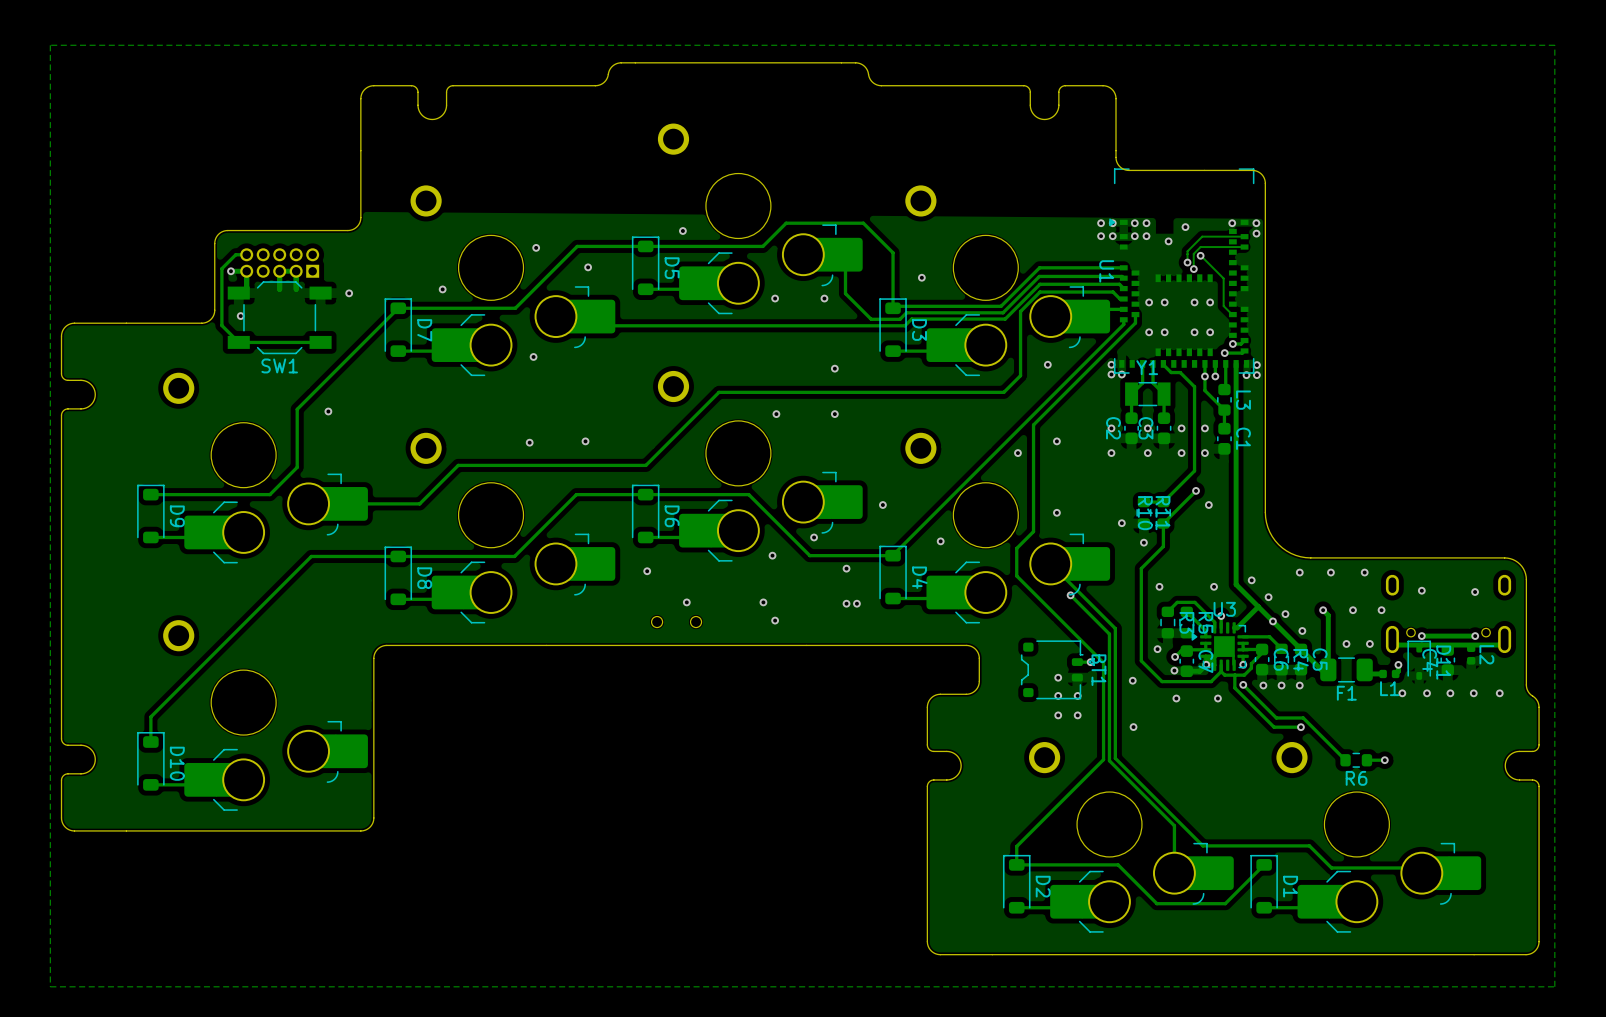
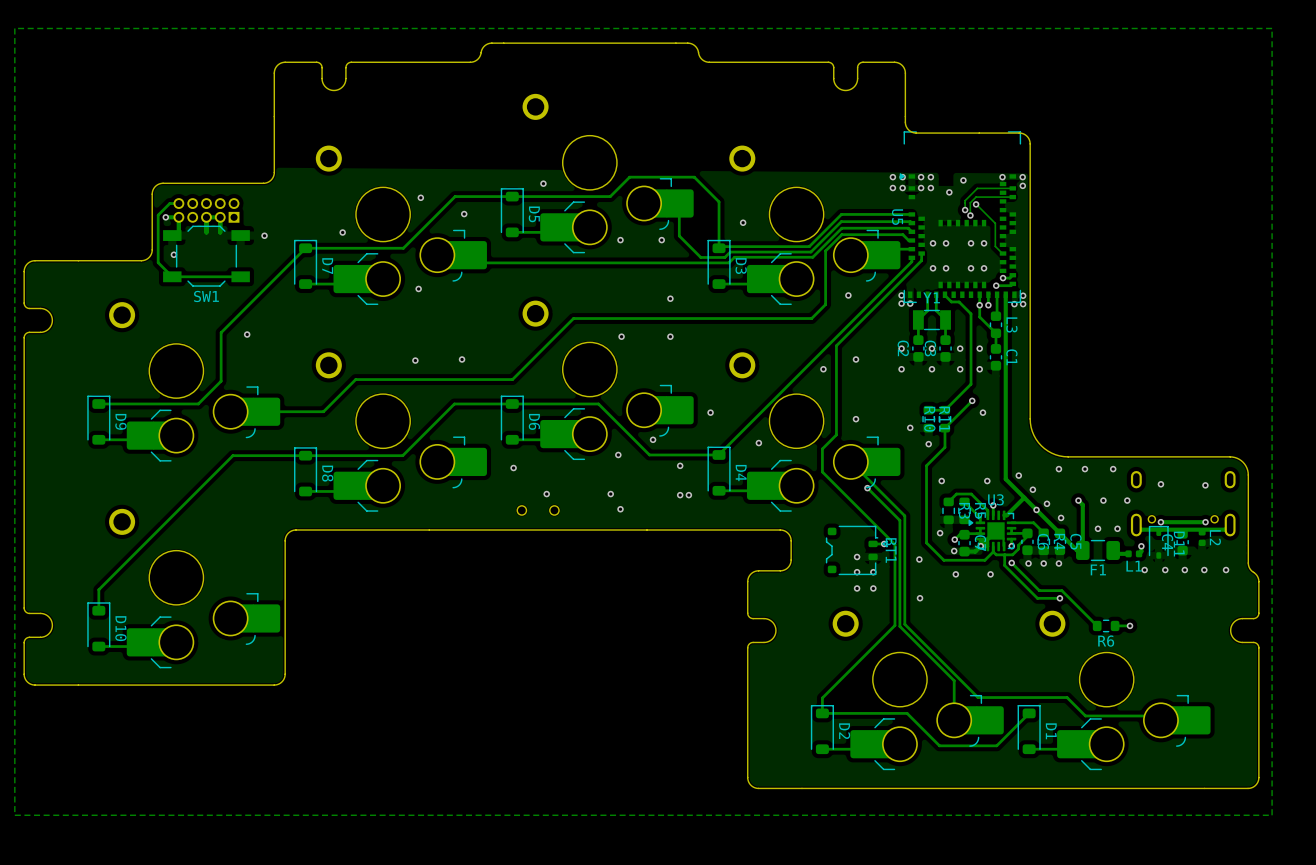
U1 name: U1 (1106, 271) -> U5 (897, 217)

